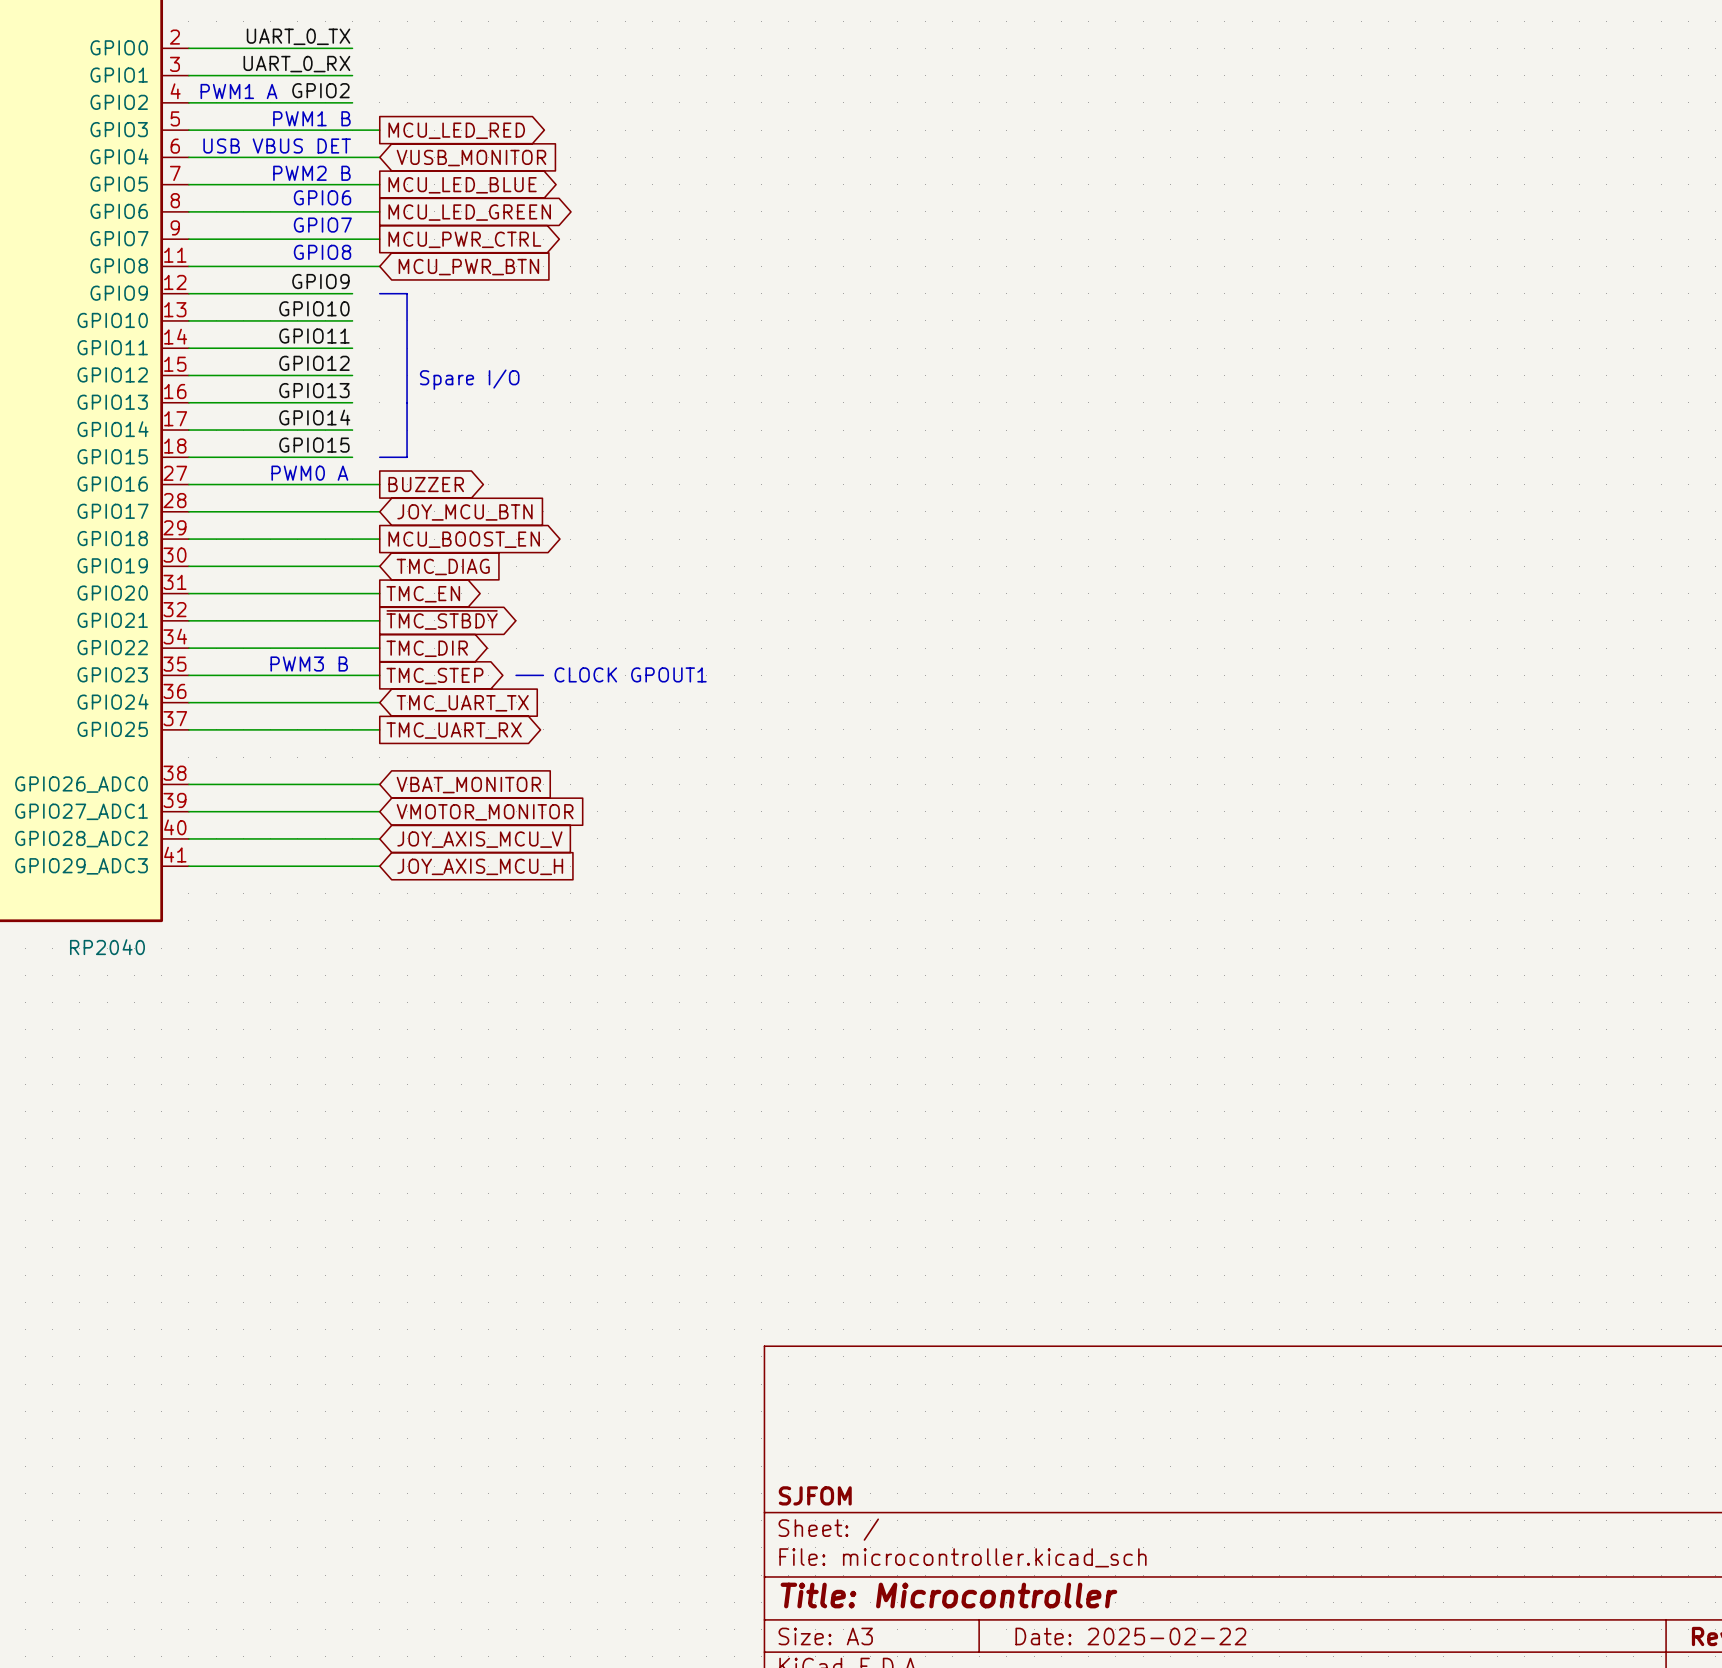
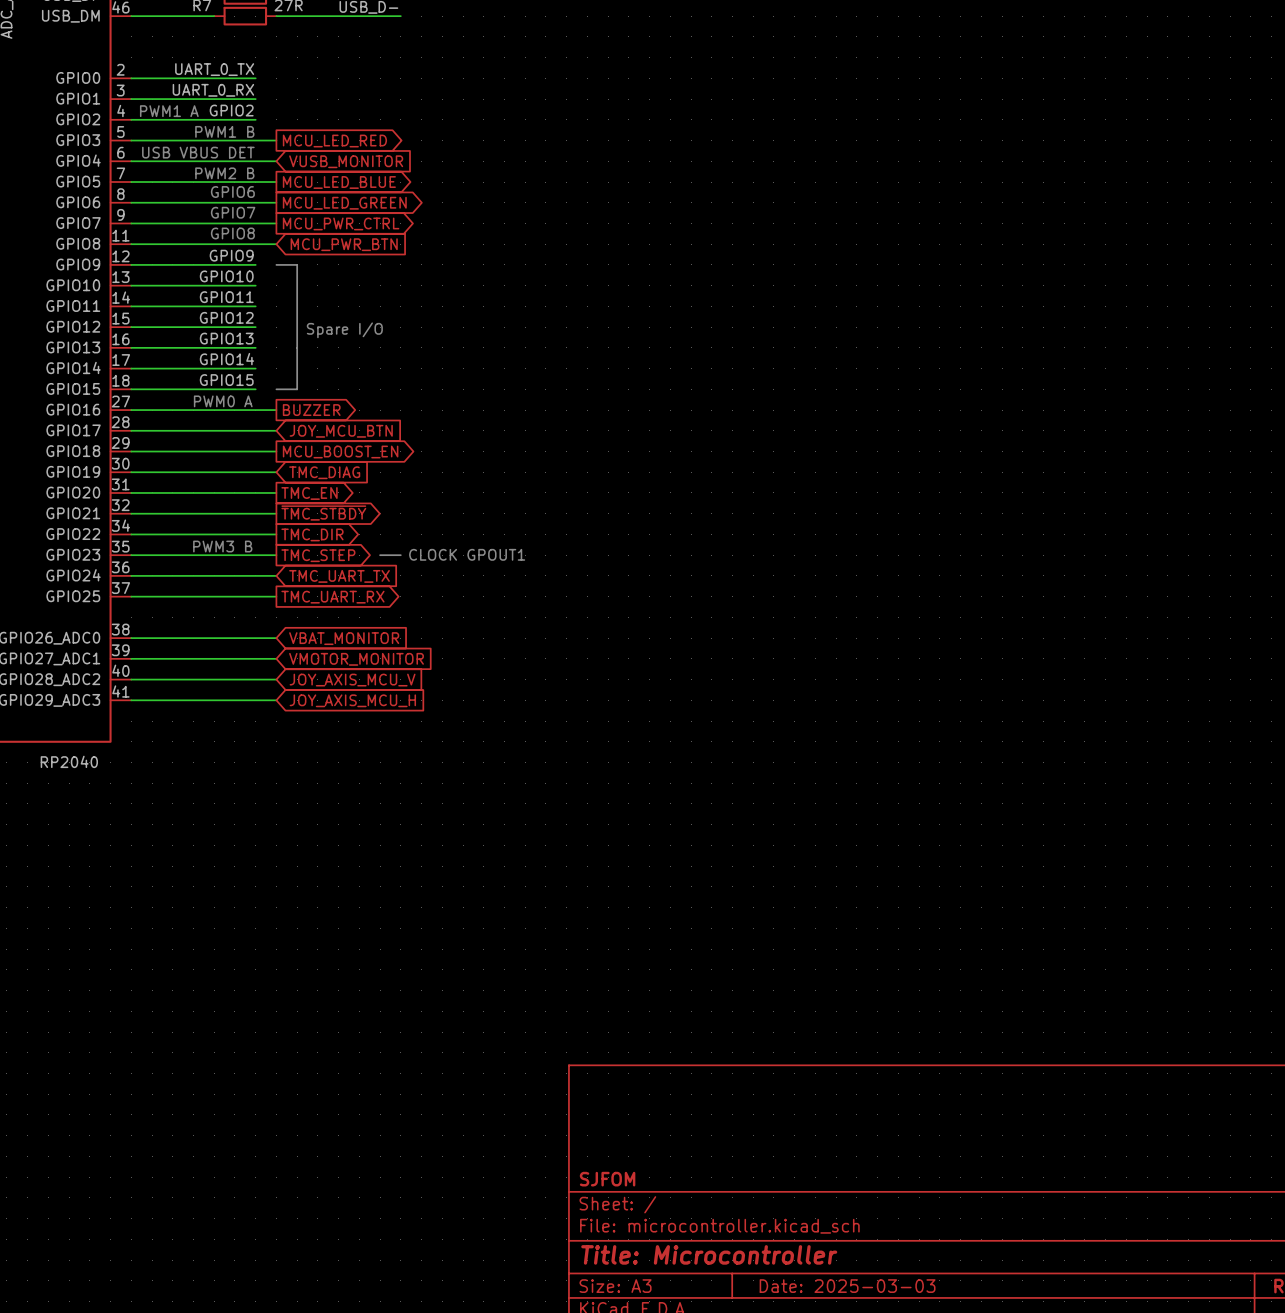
title block: Date: 2025-02-22 (1130, 1636) -> Date: 2025-03-03 (847, 1286)

